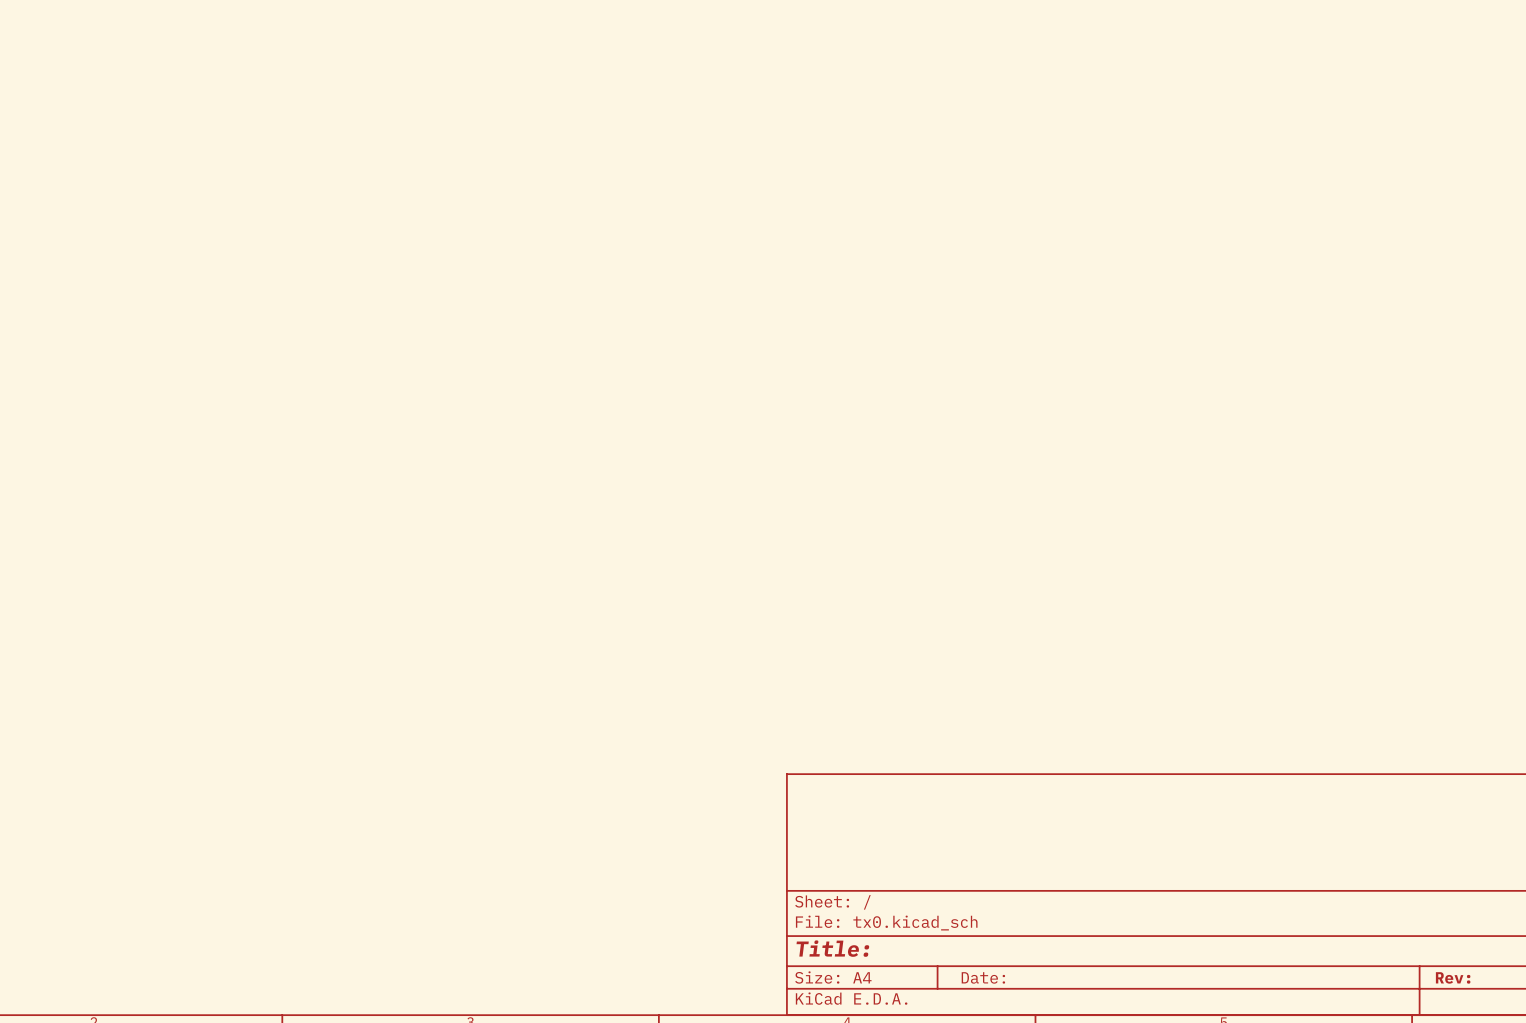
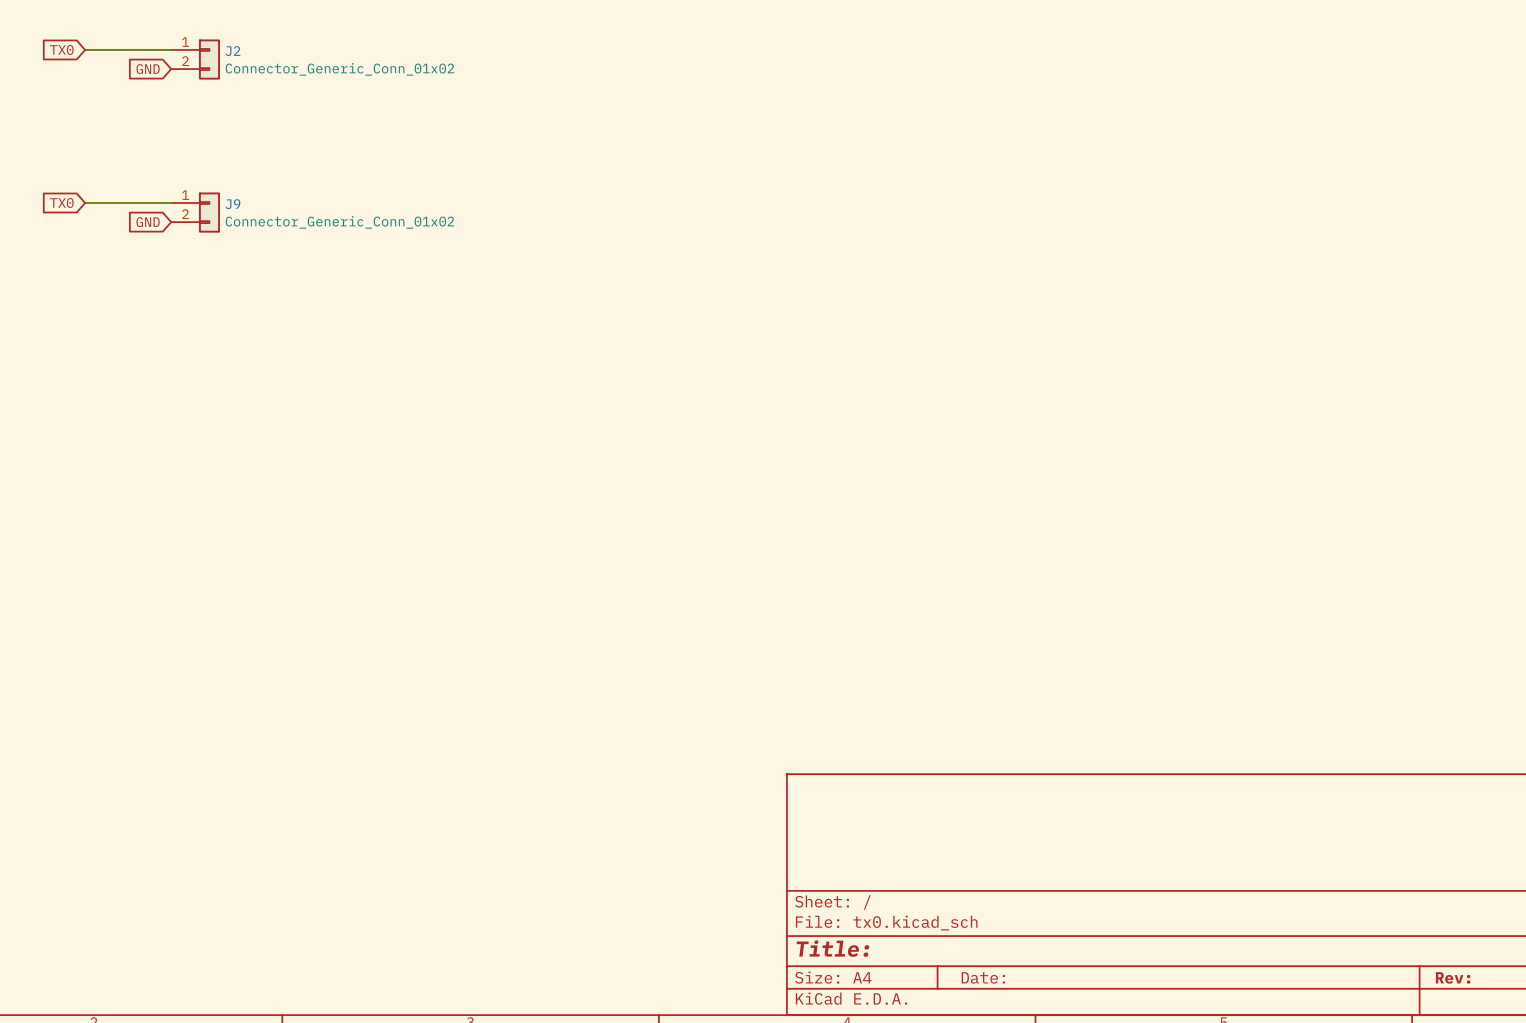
global label: none -> TX0 (61, 49)
wire: none -> (85, 49) (171, 49)
J2: none -> Connector_Generic_Conn_01x02 (195, 59)
global label: none -> GND (148, 69)
global label: none -> TX0 (61, 202)
wire: none -> (85, 202) (171, 202)
J9: none -> Connector_Generic_Conn_01x02 (195, 212)
global label: none -> GND (148, 222)

